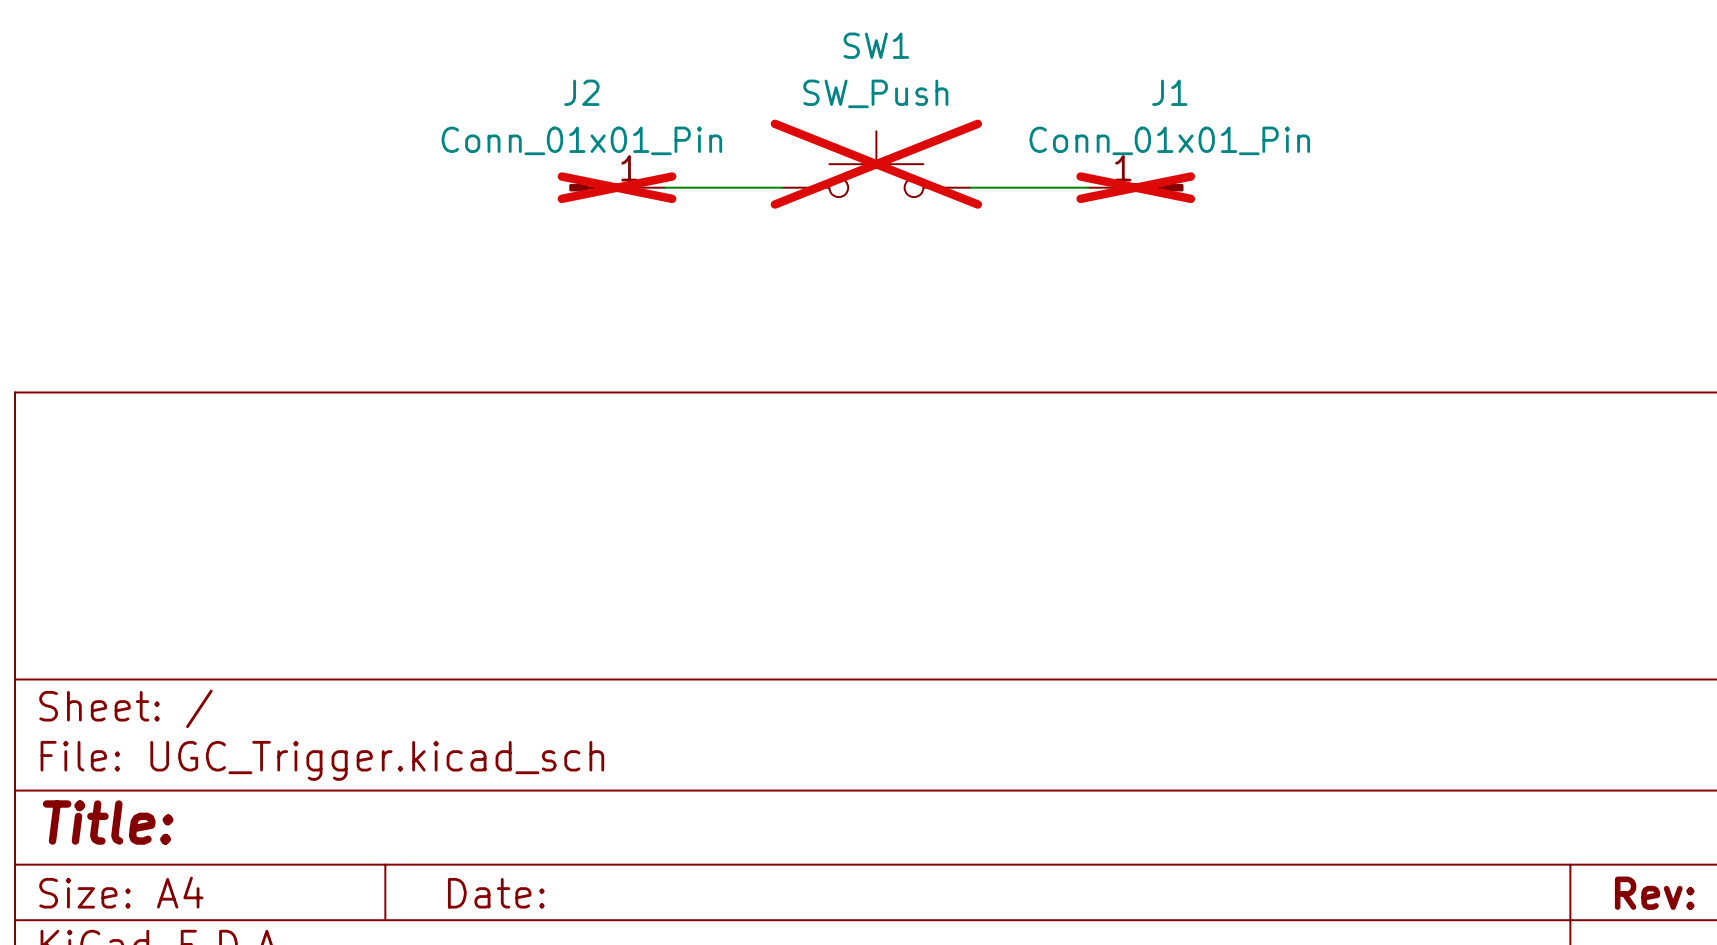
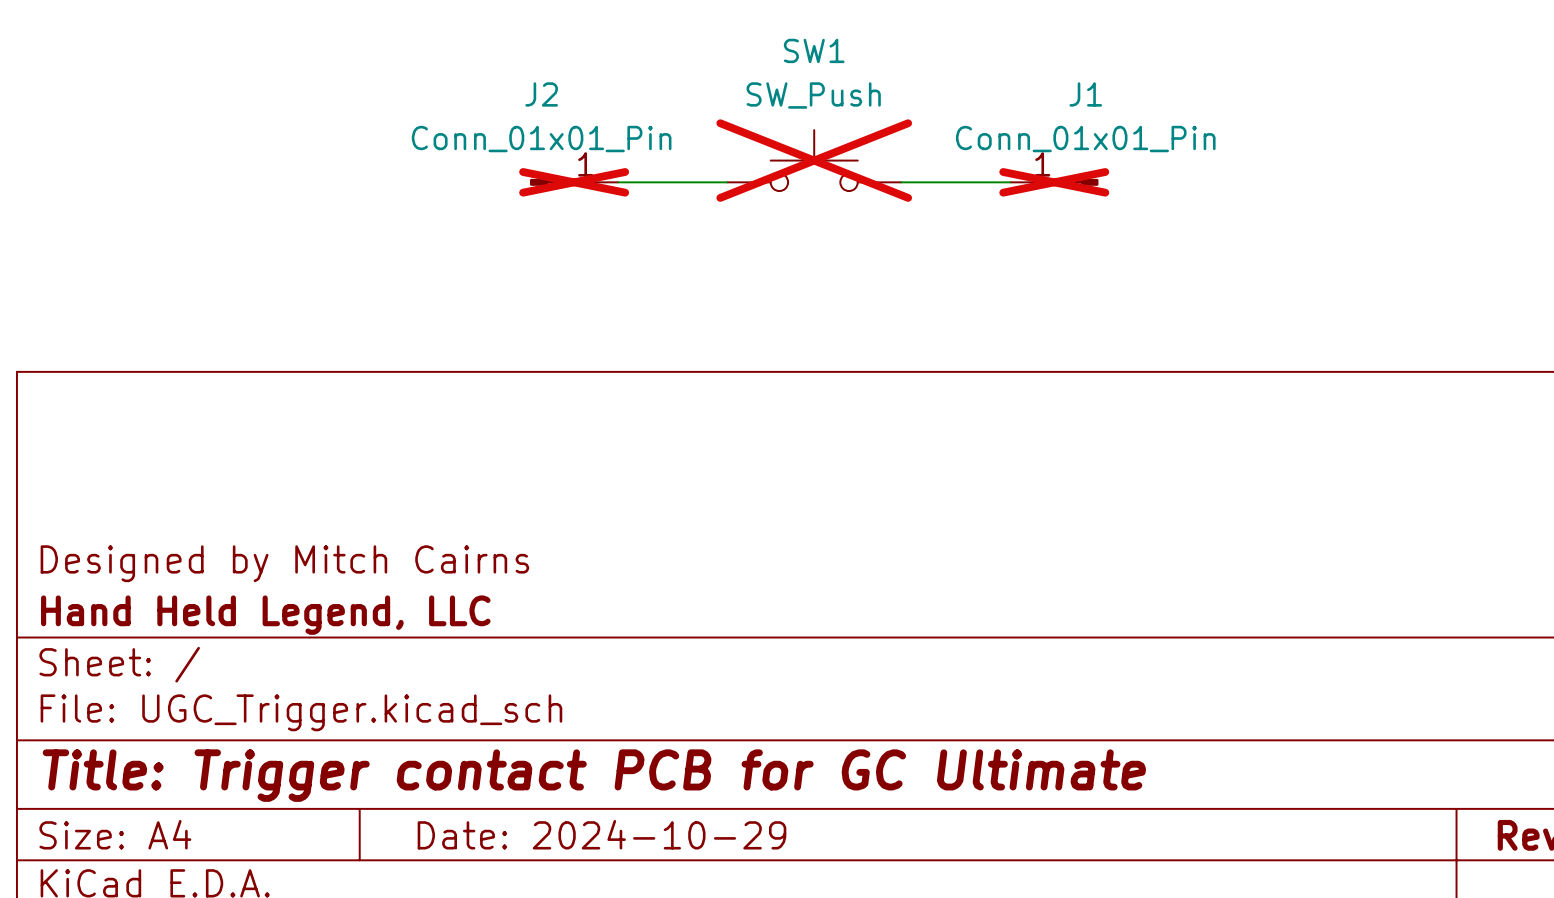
title block: none -> Designed by Mitch Cairns (284, 563)
title block: none -> Hand Held Legend, LLC (265, 615)
title block: Title: (108, 822) -> Title: Trigger contact PCB for GC Ultimate (594, 775)
title block: Date: (496, 893) -> Date: 2024-10-29 (601, 834)

